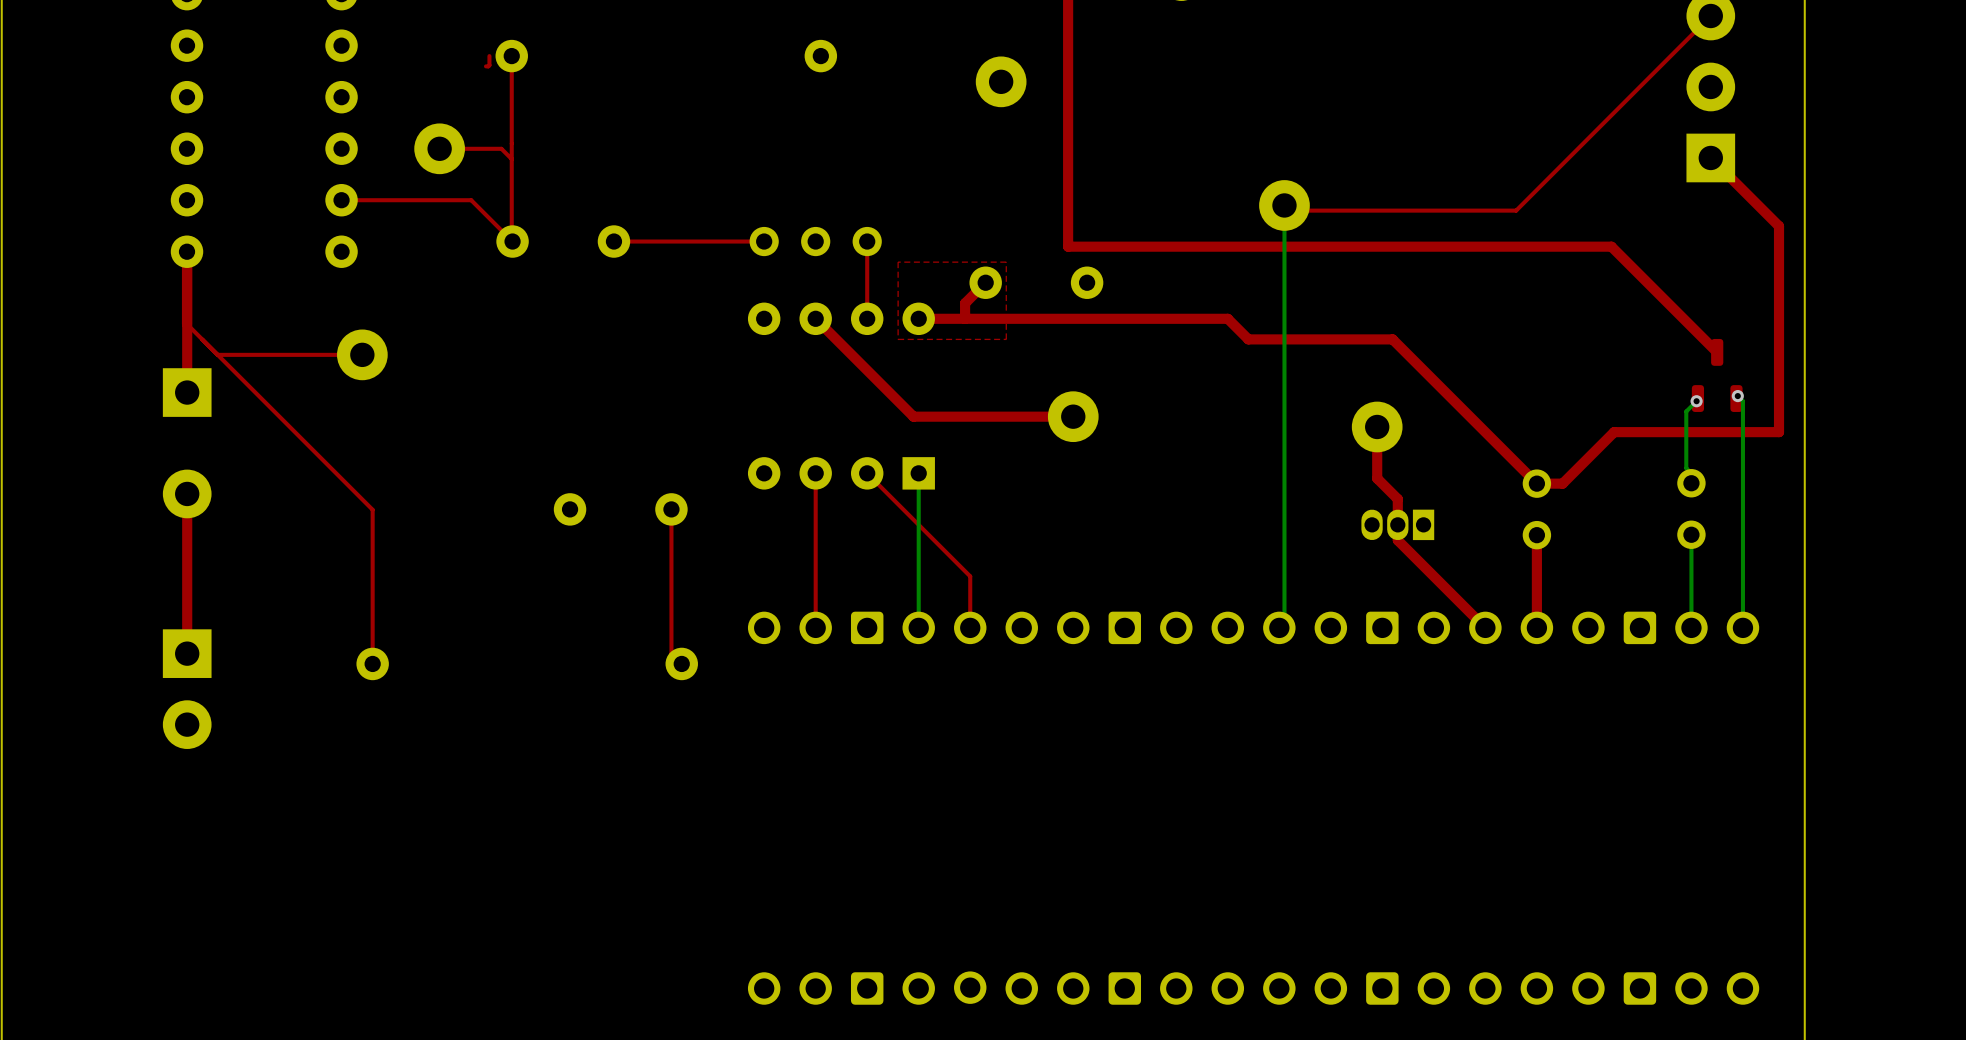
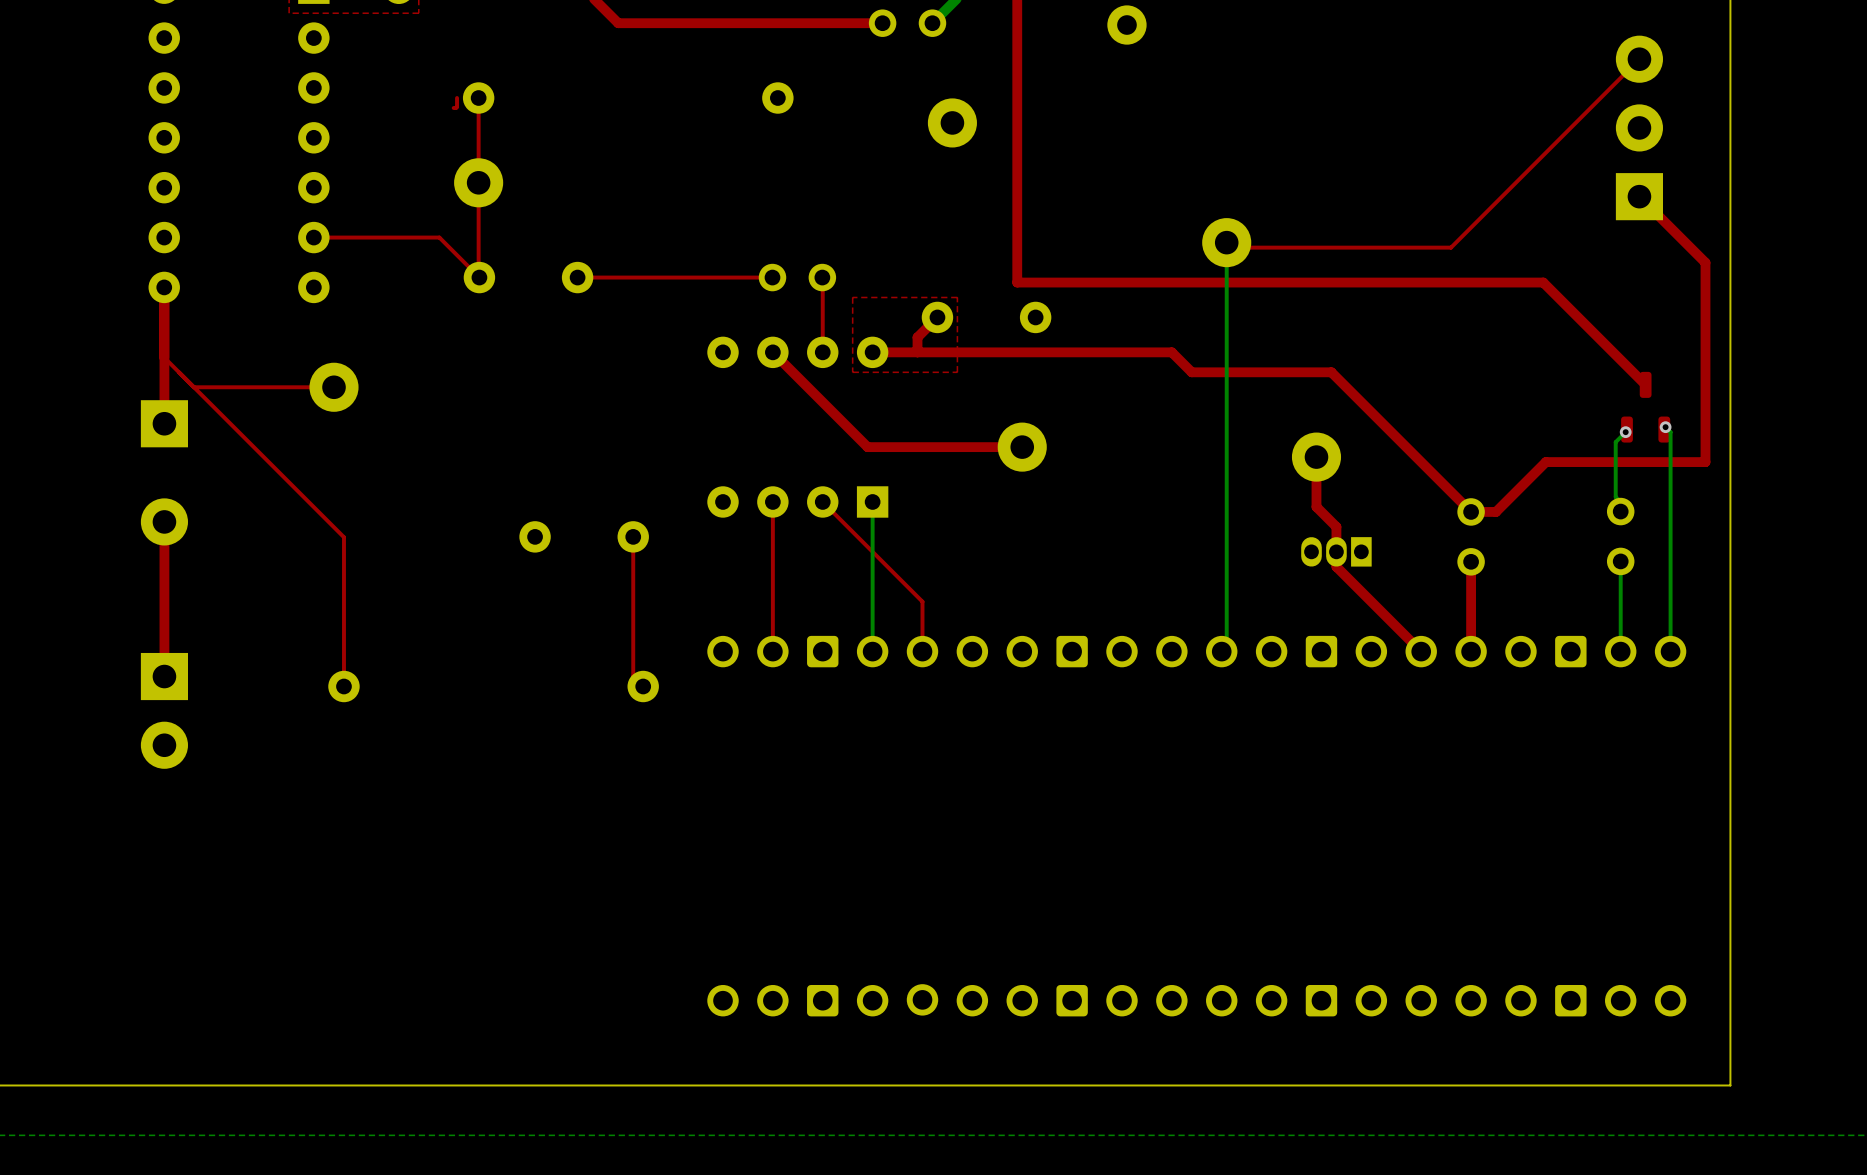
top track: (439, 148) (501, 148) (511, 159) -> none
part position: (439, 148) -> (478, 182)
top track: none -> (772, 277) (723, 277)
part: (815, 241) -> none
part: none -> (797, 277)

